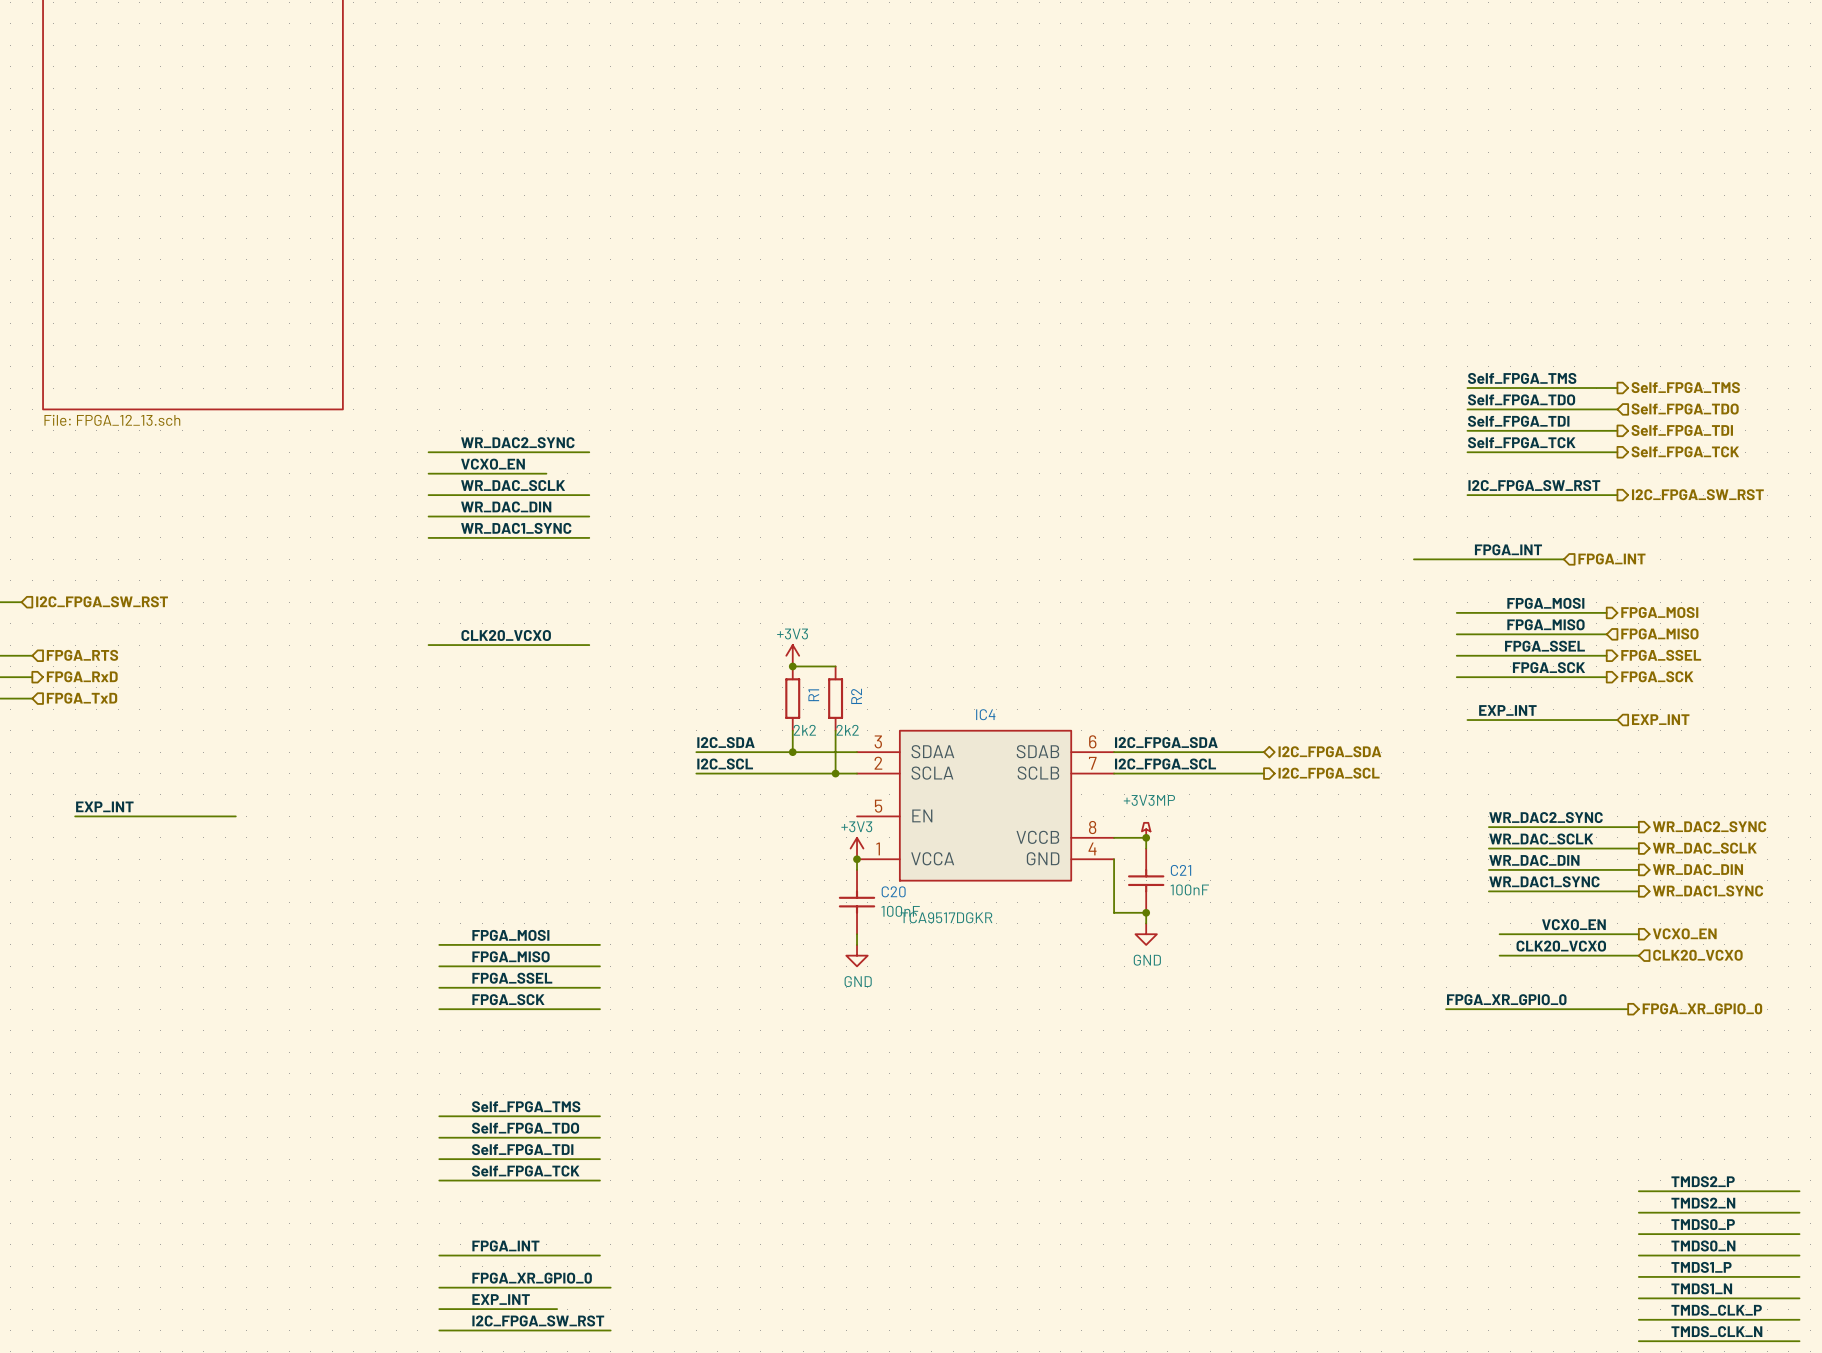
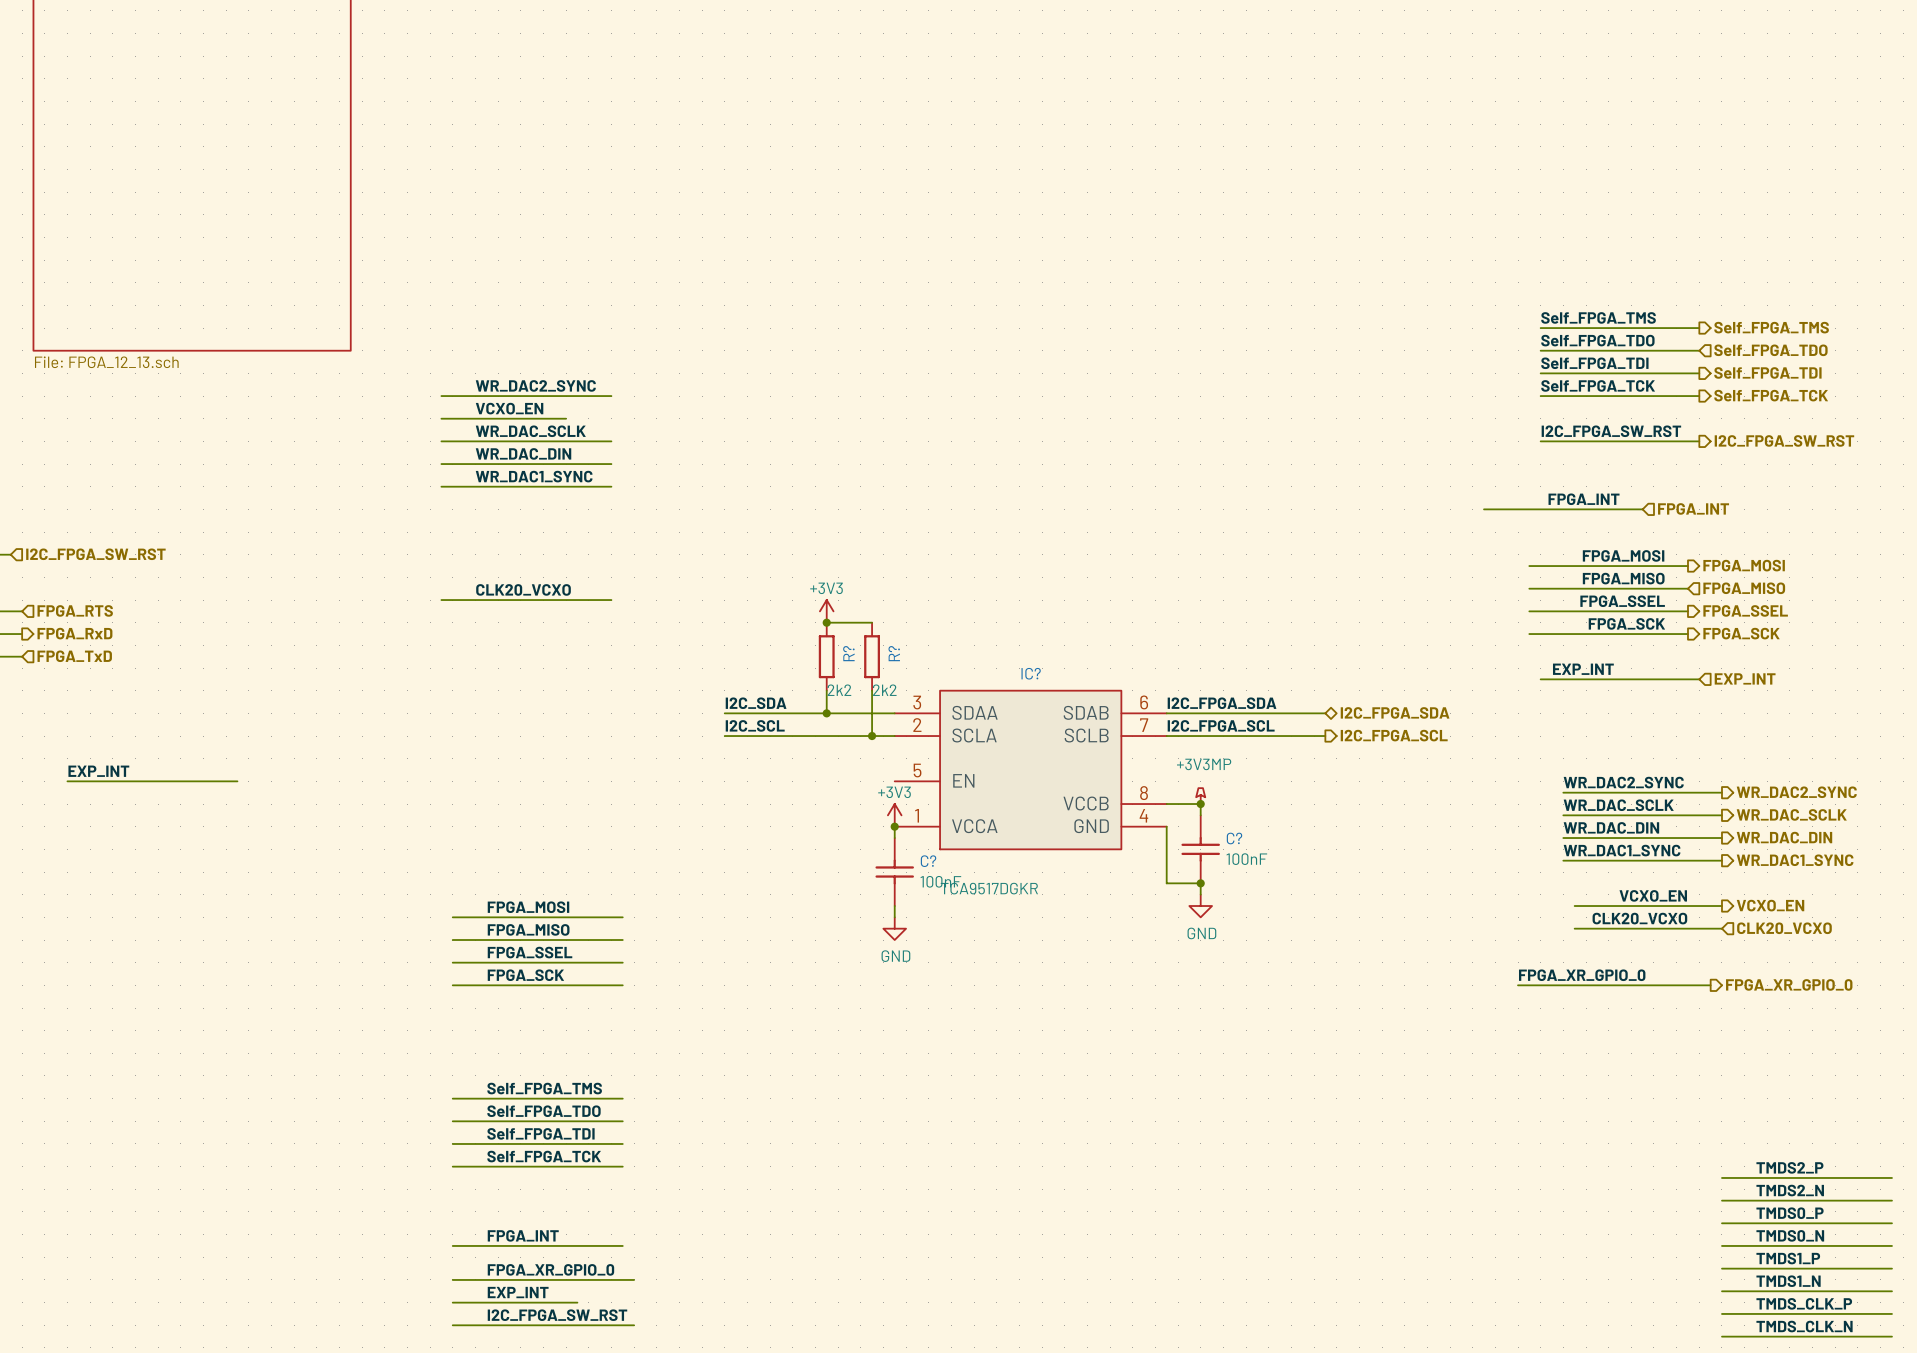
R1 name: R1 (813, 695) -> R? (848, 653)
R2 name: R2 (856, 696) -> R? (894, 653)
IC4 name: IC4 (985, 714) -> IC? (1031, 673)
C21 name: C21 (1181, 870) -> C? (1234, 838)
C20 name: C20 (893, 891) -> C? (928, 861)

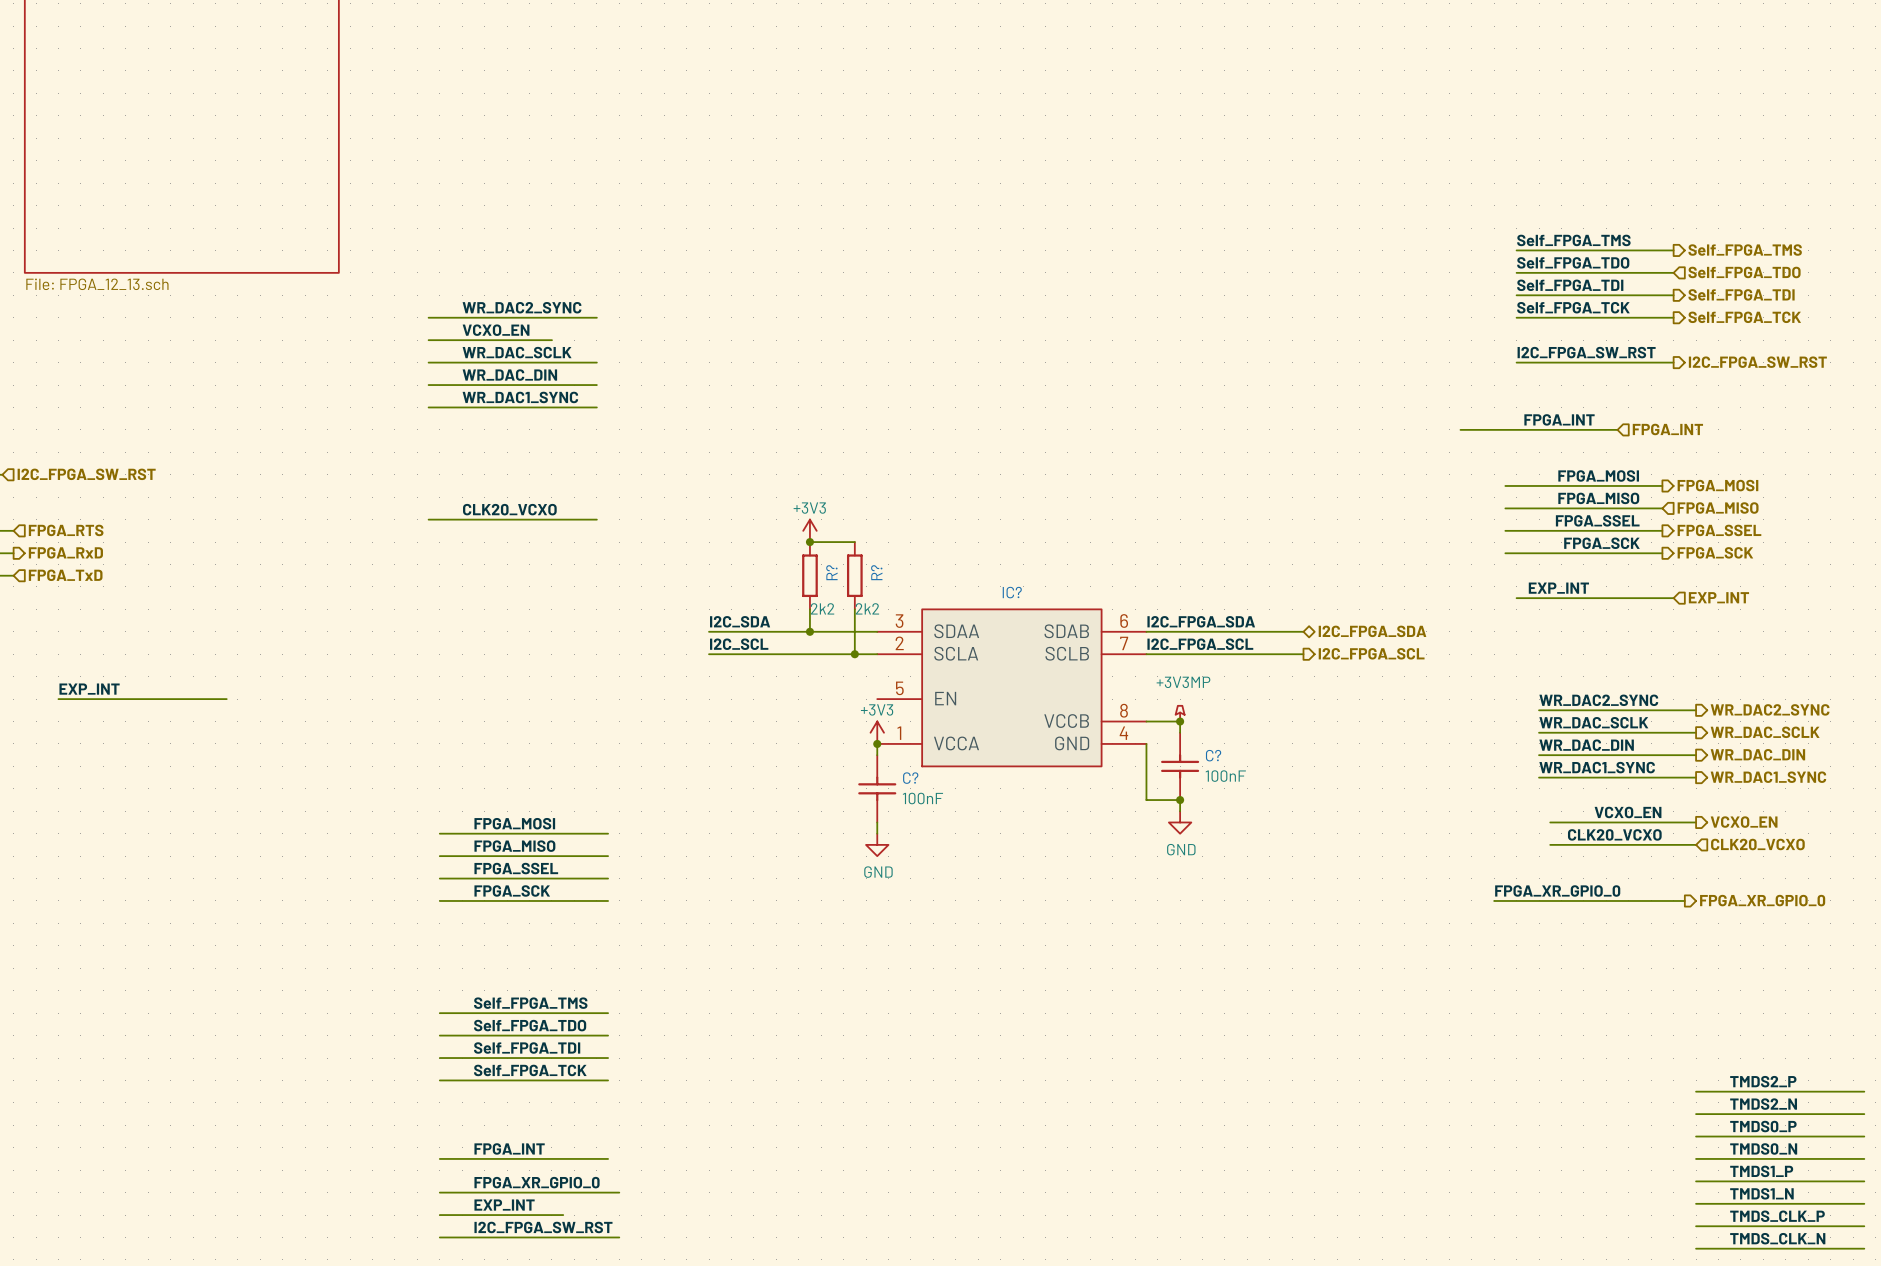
IC? value: TCA9517DGKR (989, 888) -> none

